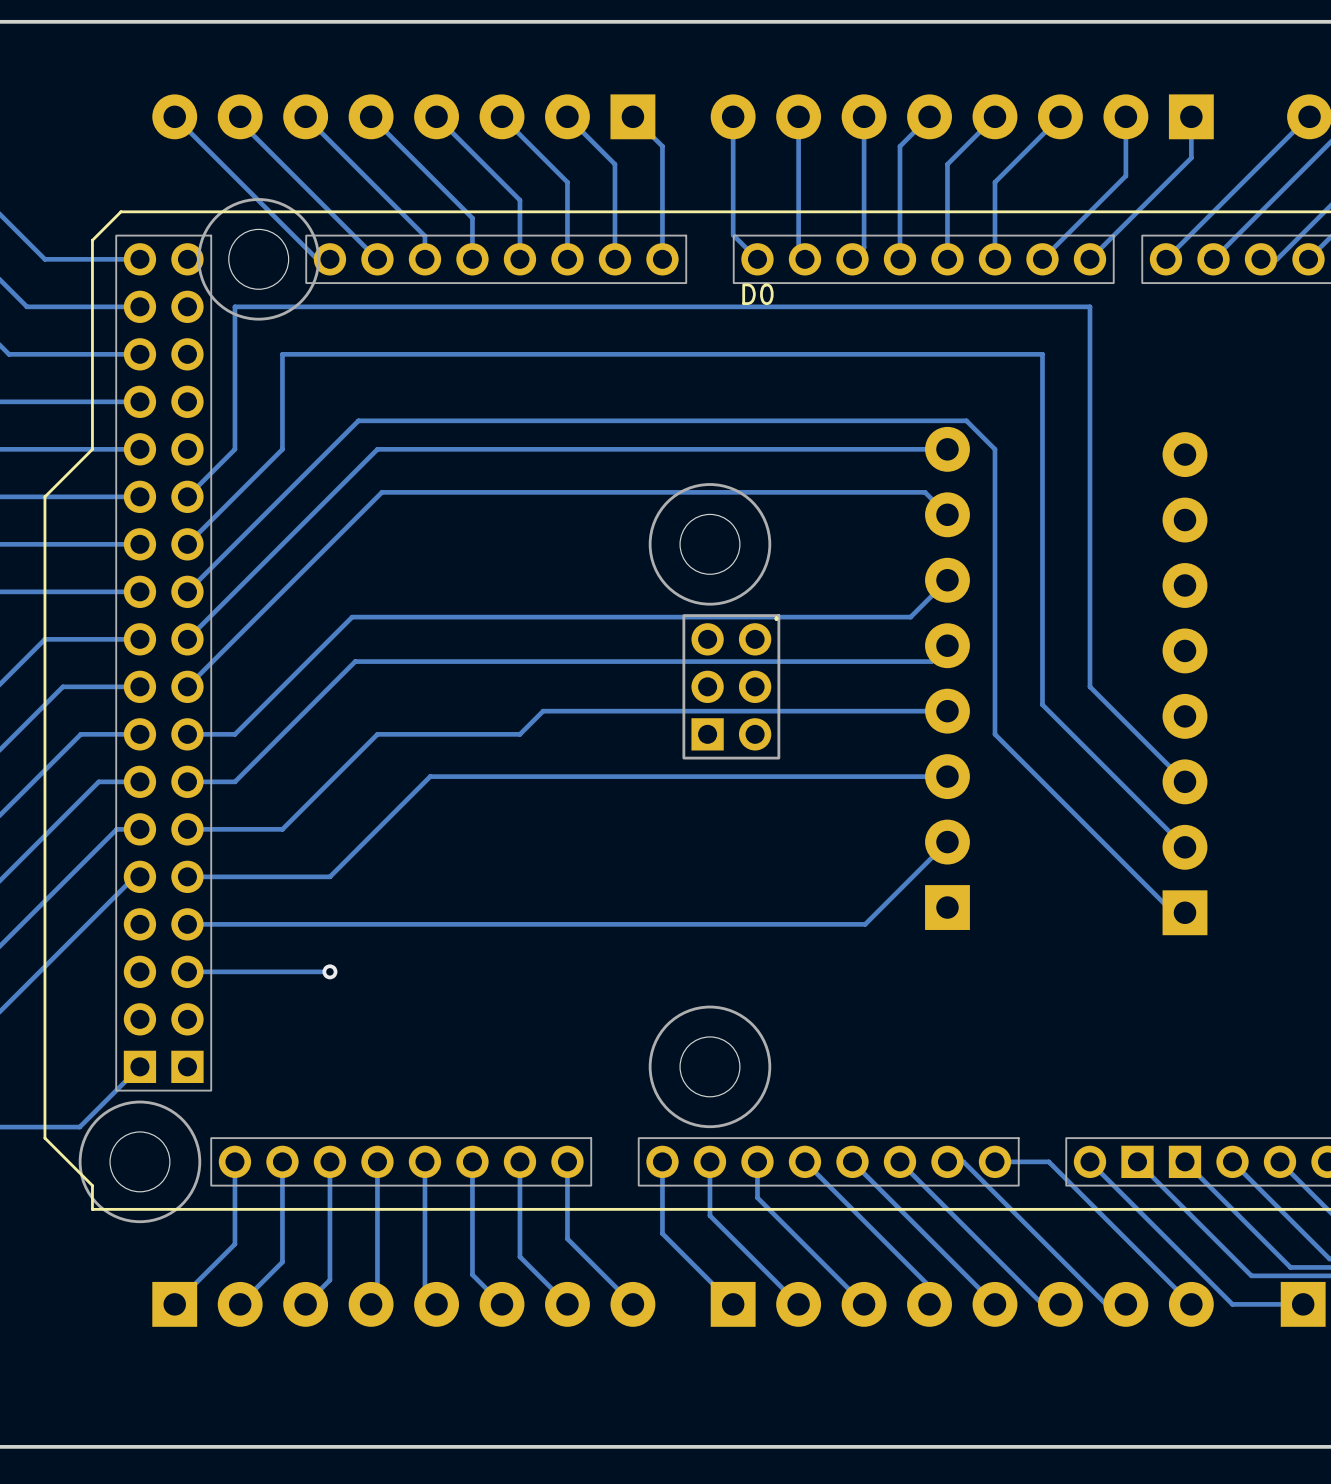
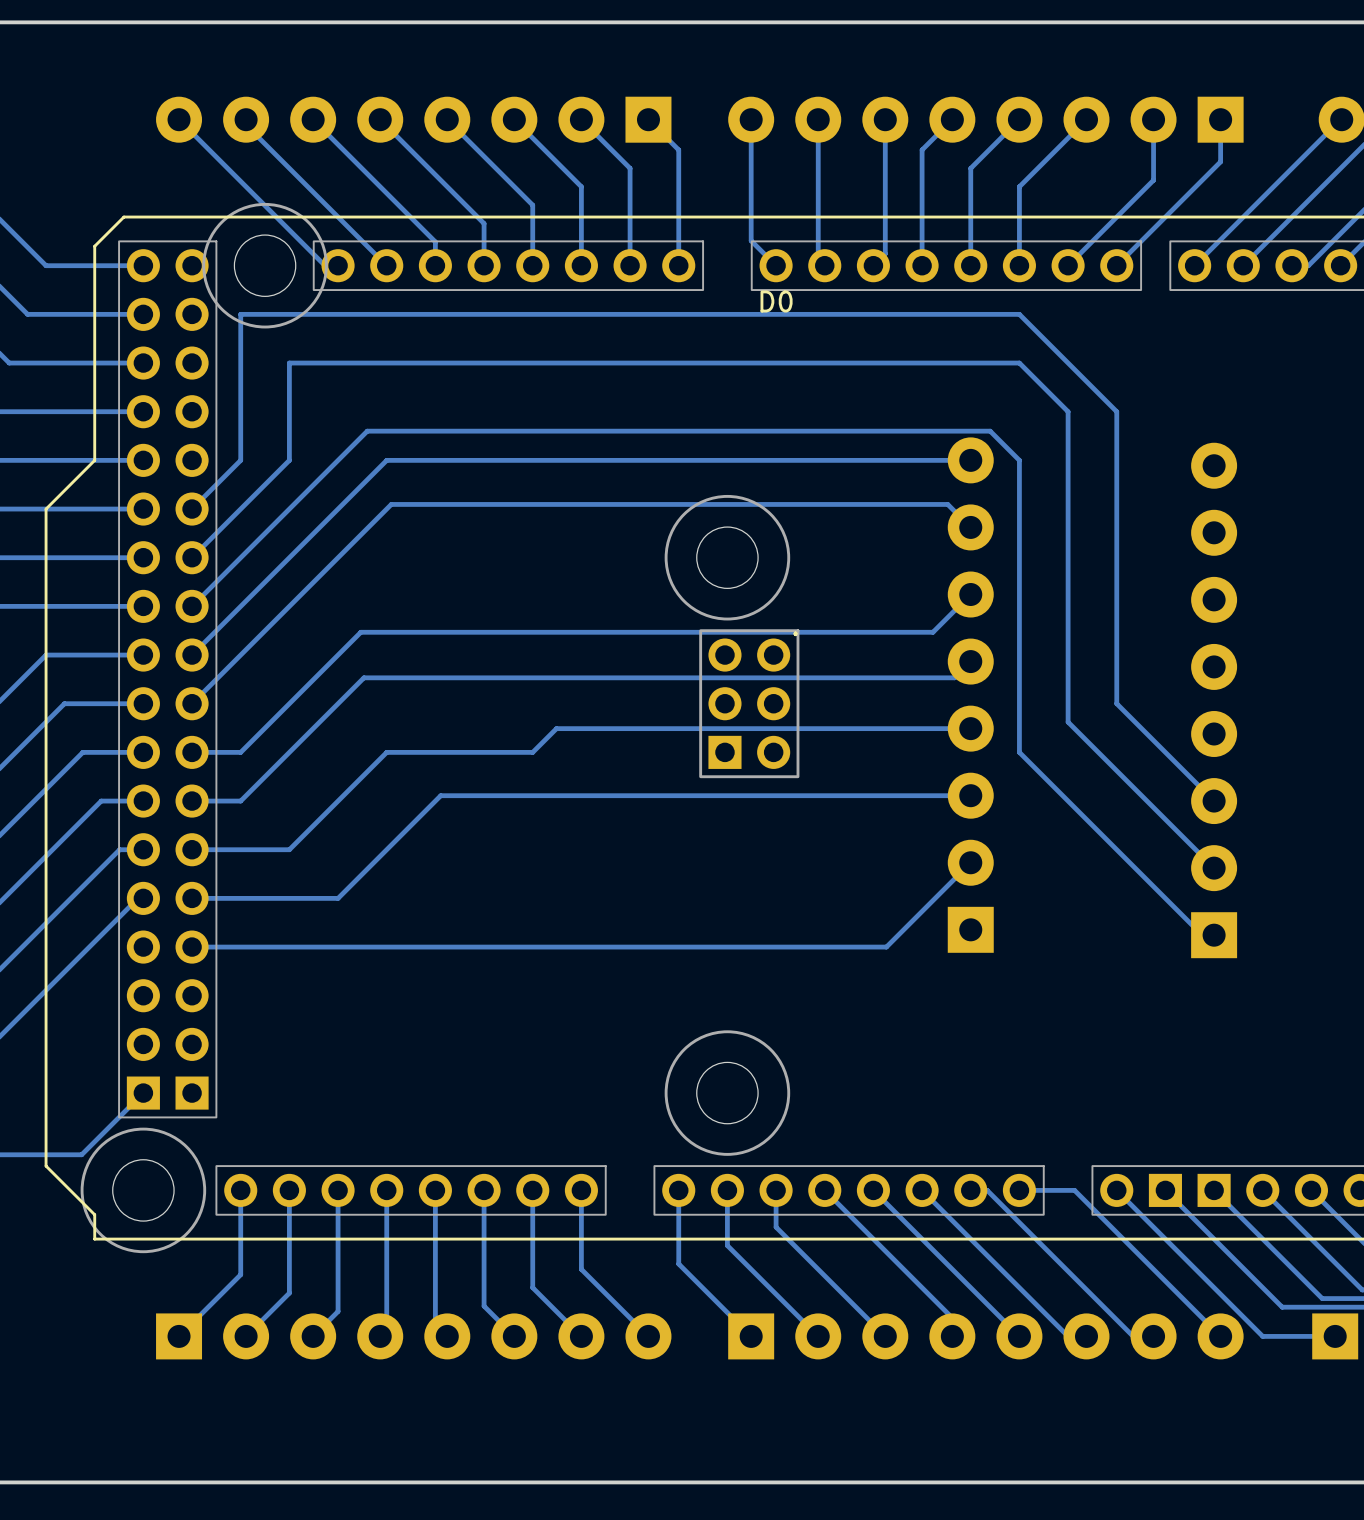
track: (994, 306) (1089, 306) (1089, 401) -> (1019, 314) (1116, 411)
track: (994, 354) (1042, 354) (1042, 401) -> (1019, 363) (1068, 411)
track: (329, 971) (187, 971) -> none
via: (329, 971) -> none

